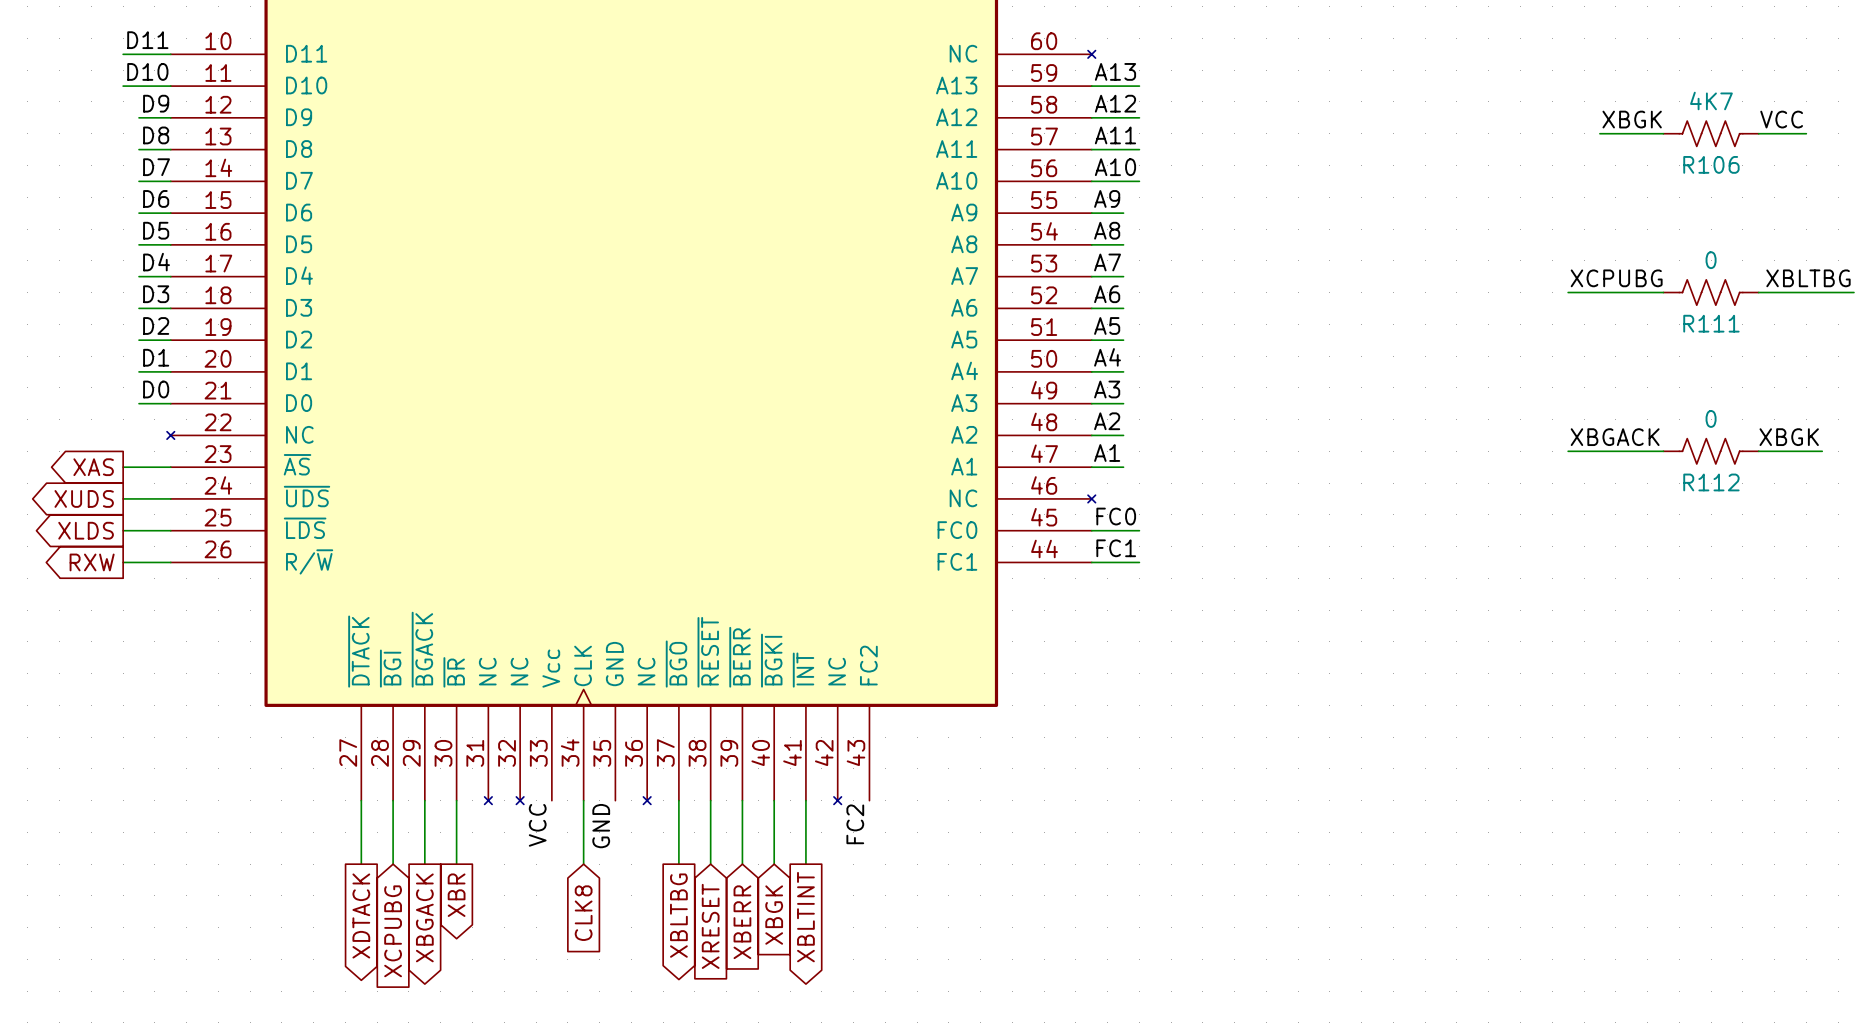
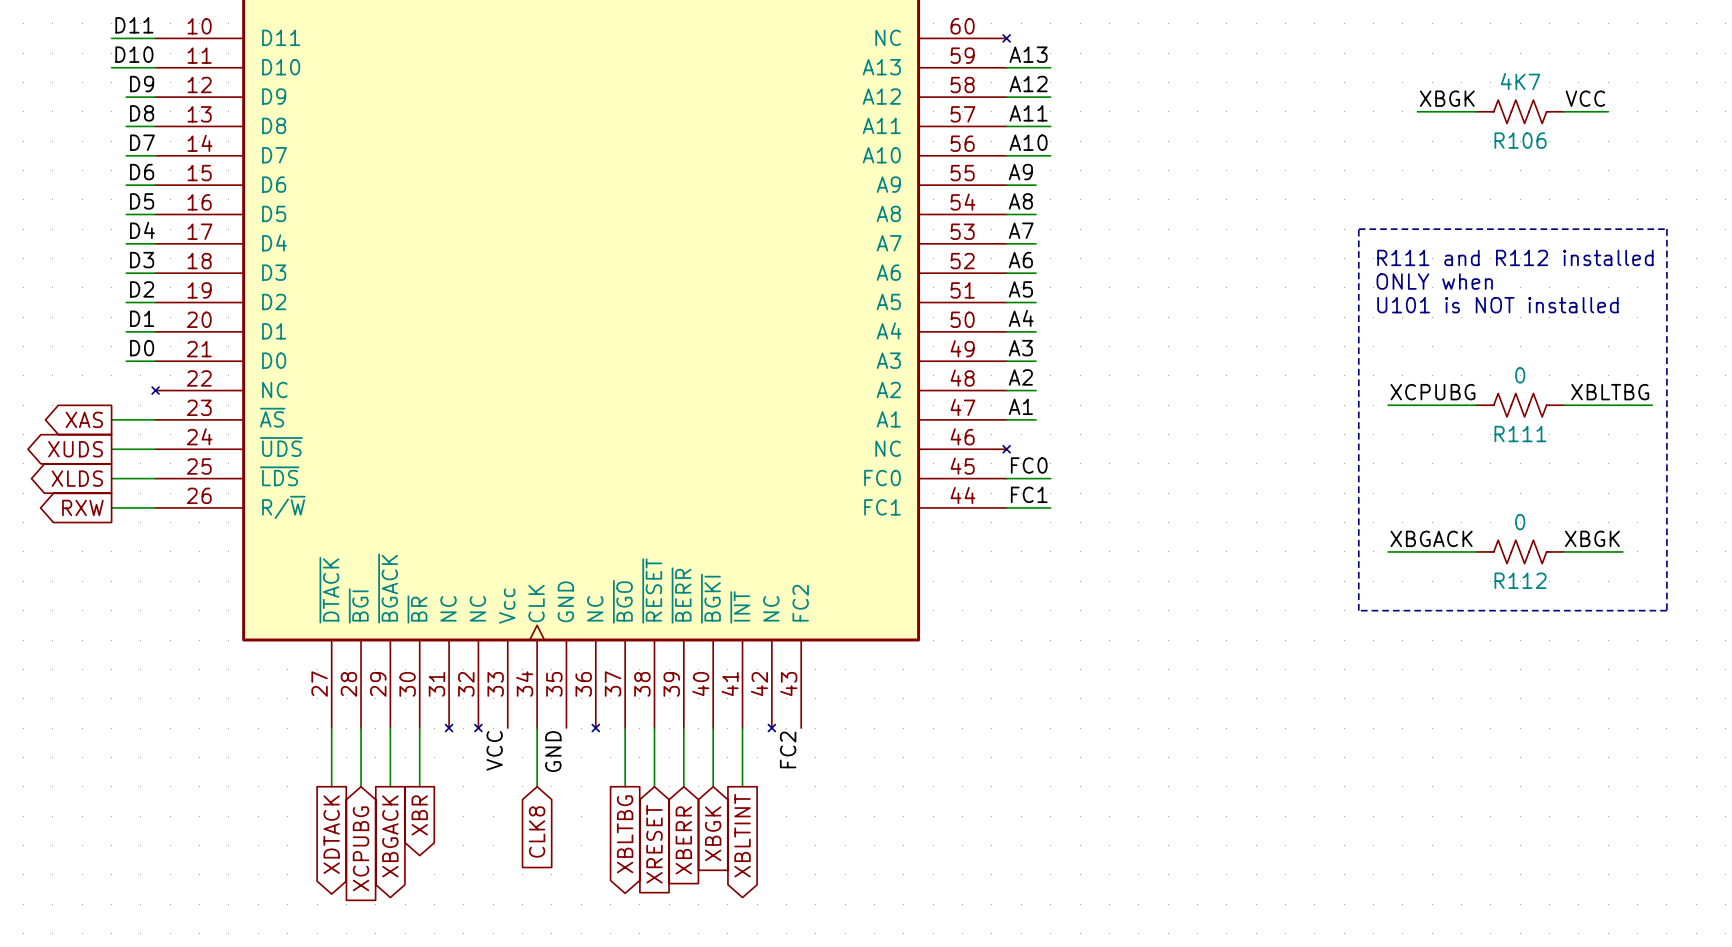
label position: XBGK (1632, 119) -> XBGK (1447, 98)
label position: VCC (1781, 119) -> VCC (1585, 98)
wire: (1599, 133) (1663, 133) -> (1476, 111) (1417, 111)
R106 position: (1711, 133) -> (1520, 111)
wire: (1758, 133) (1806, 133) -> (1564, 111) (1608, 111)
line: none -> (1358, 229) (1666, 229) (1666, 610) (1358, 610) (1358, 229)
label position: XCPUBG (1616, 278) -> XCPUBG (1432, 392)
label position: XBLTBG (1808, 278) -> XBLTBG (1610, 392)
text: none -> R111 and R112 installed (1515, 257)
wire: (1568, 292) (1663, 292) -> none
R111 position: (1711, 292) -> (1520, 405)
wire: (1758, 292) (1853, 292) -> none
text: none -> ONLY when (1434, 281)
text: none -> U101 is NOT installed (1497, 305)
label position: XBGACK (1615, 437) -> XBGACK (1431, 538)
label position: XBGK (1789, 437) -> XBGK (1592, 538)
wire: (1599, 451) (1663, 451) -> (1388, 405) (1446, 405)
wire: none -> (1564, 405) (1622, 405)
R112 position: (1711, 451) -> (1520, 551)
wire: (1790, 451) (1822, 451) -> none
wire: none -> (1388, 551) (1476, 551)
wire: none -> (1564, 551) (1622, 551)

